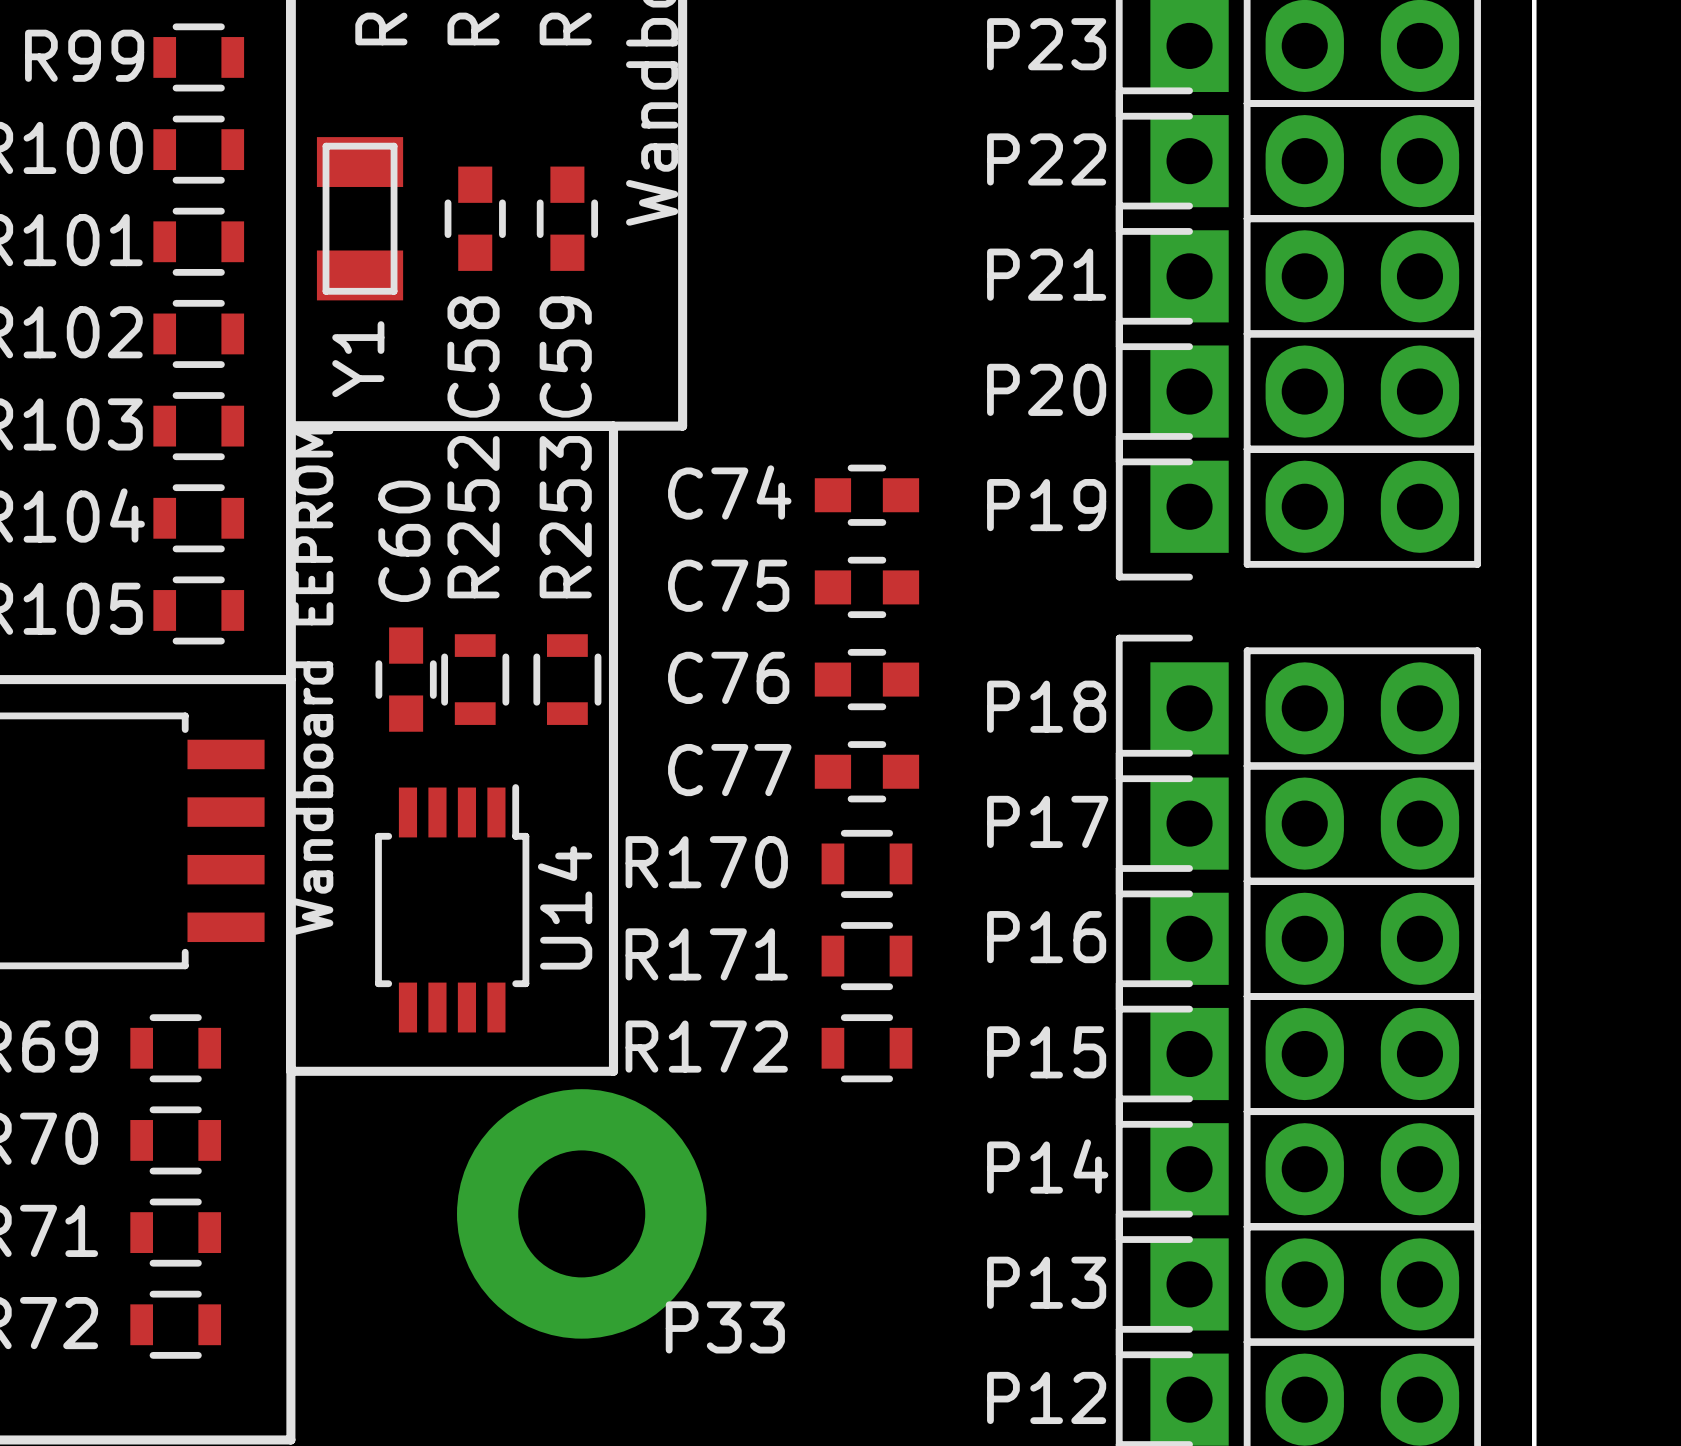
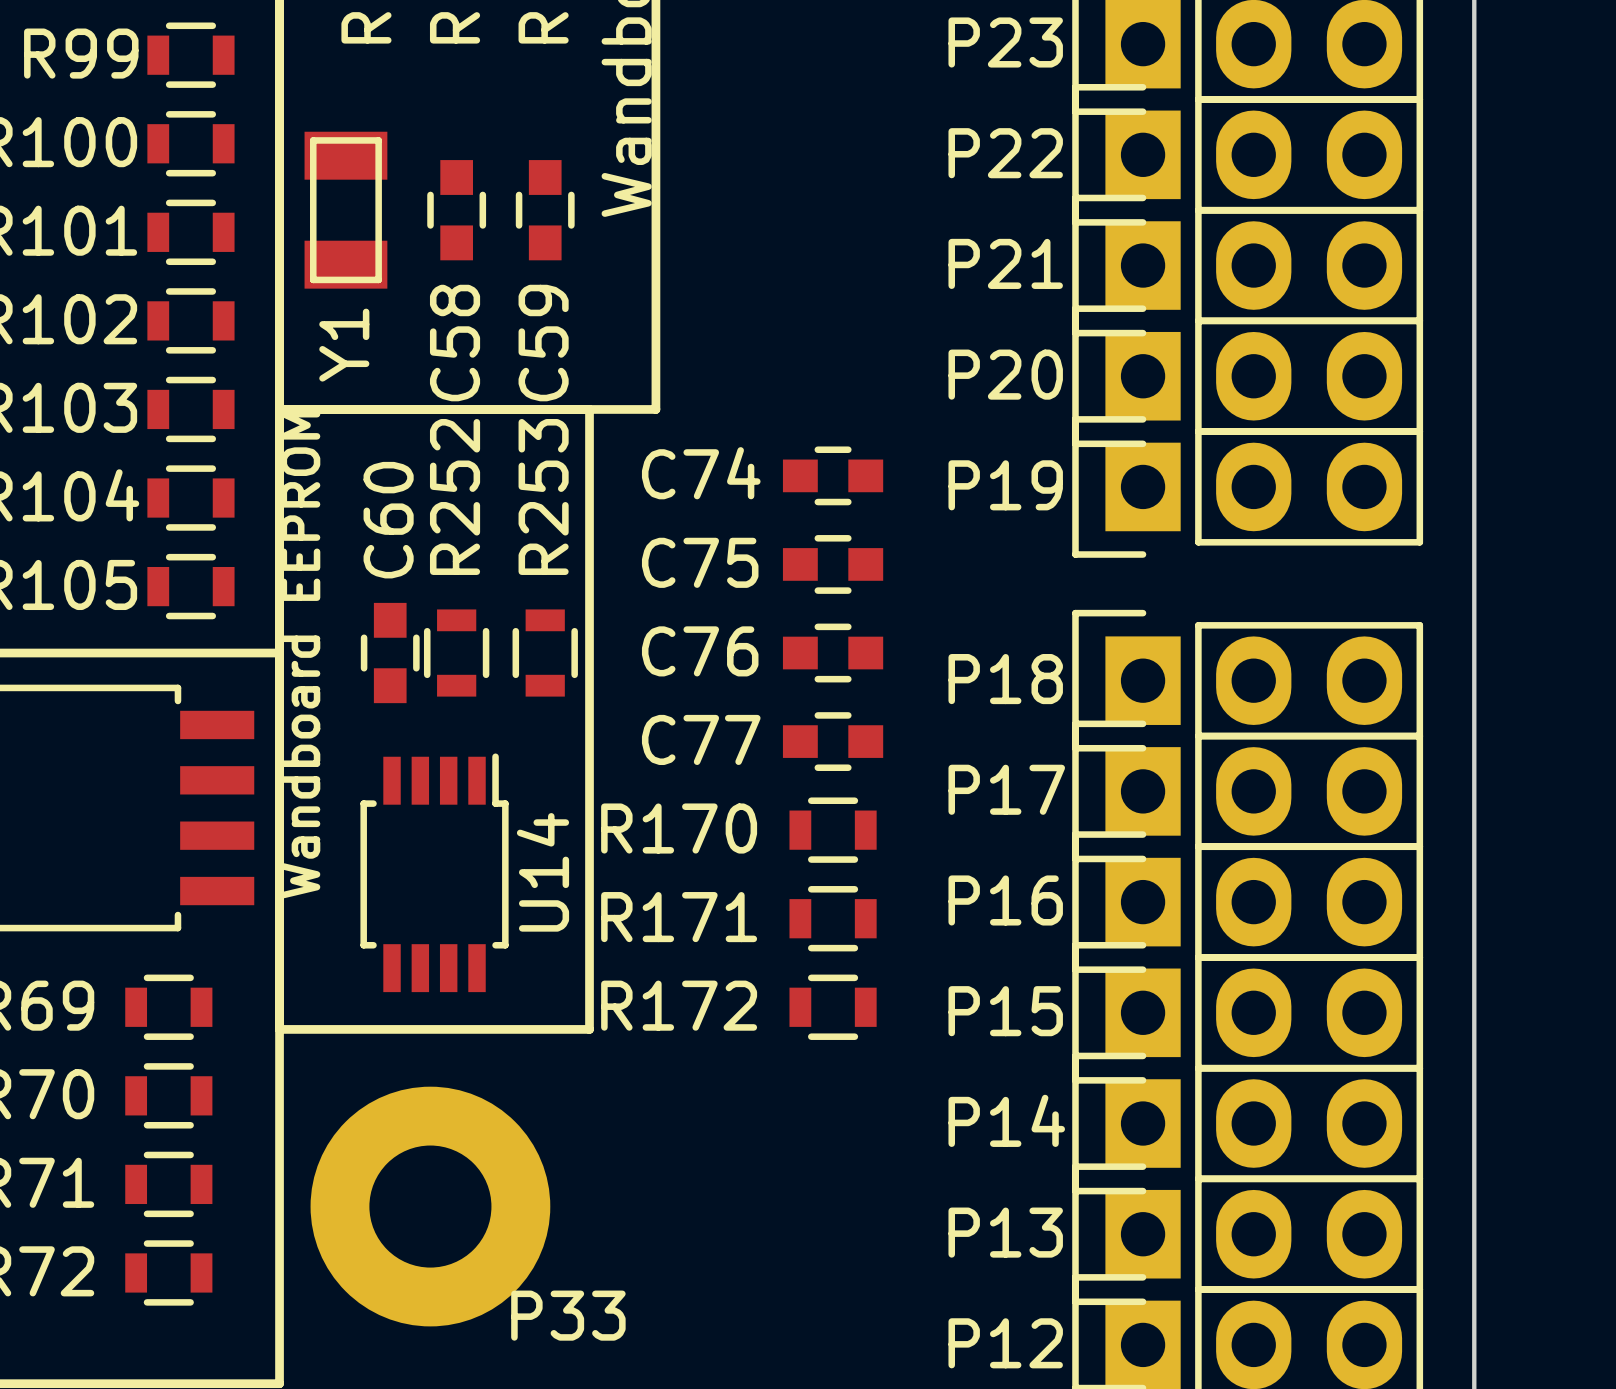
P33 position: (581, 1213) -> (430, 1206)

